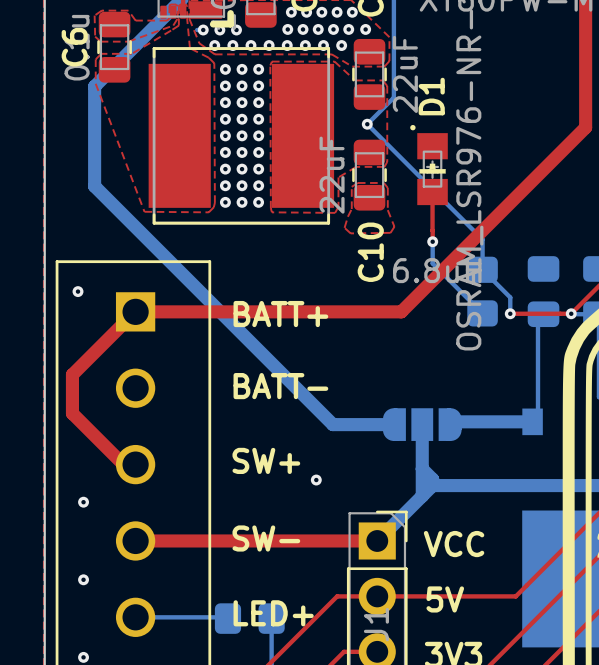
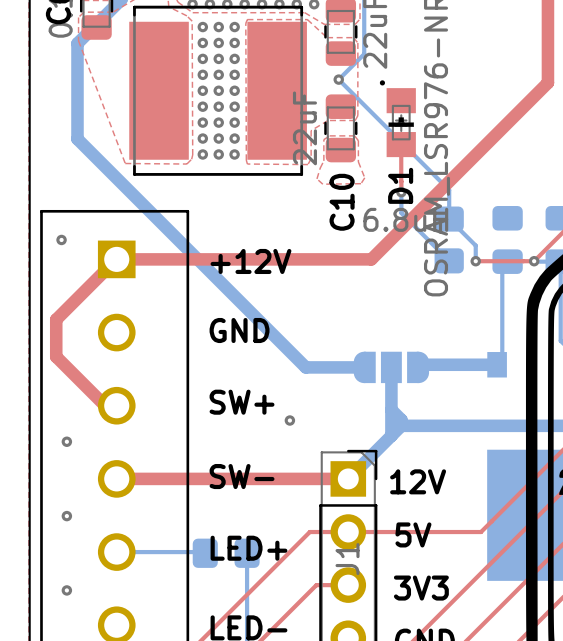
D1 name position: D1 (431, 96) -> D1 (400, 185)
text: BATT+ (280, 314) -> +12V (250, 261)
text: BATT- (280, 386) -> GND (239, 330)
text: VCC (454, 544) -> 12V (418, 481)

